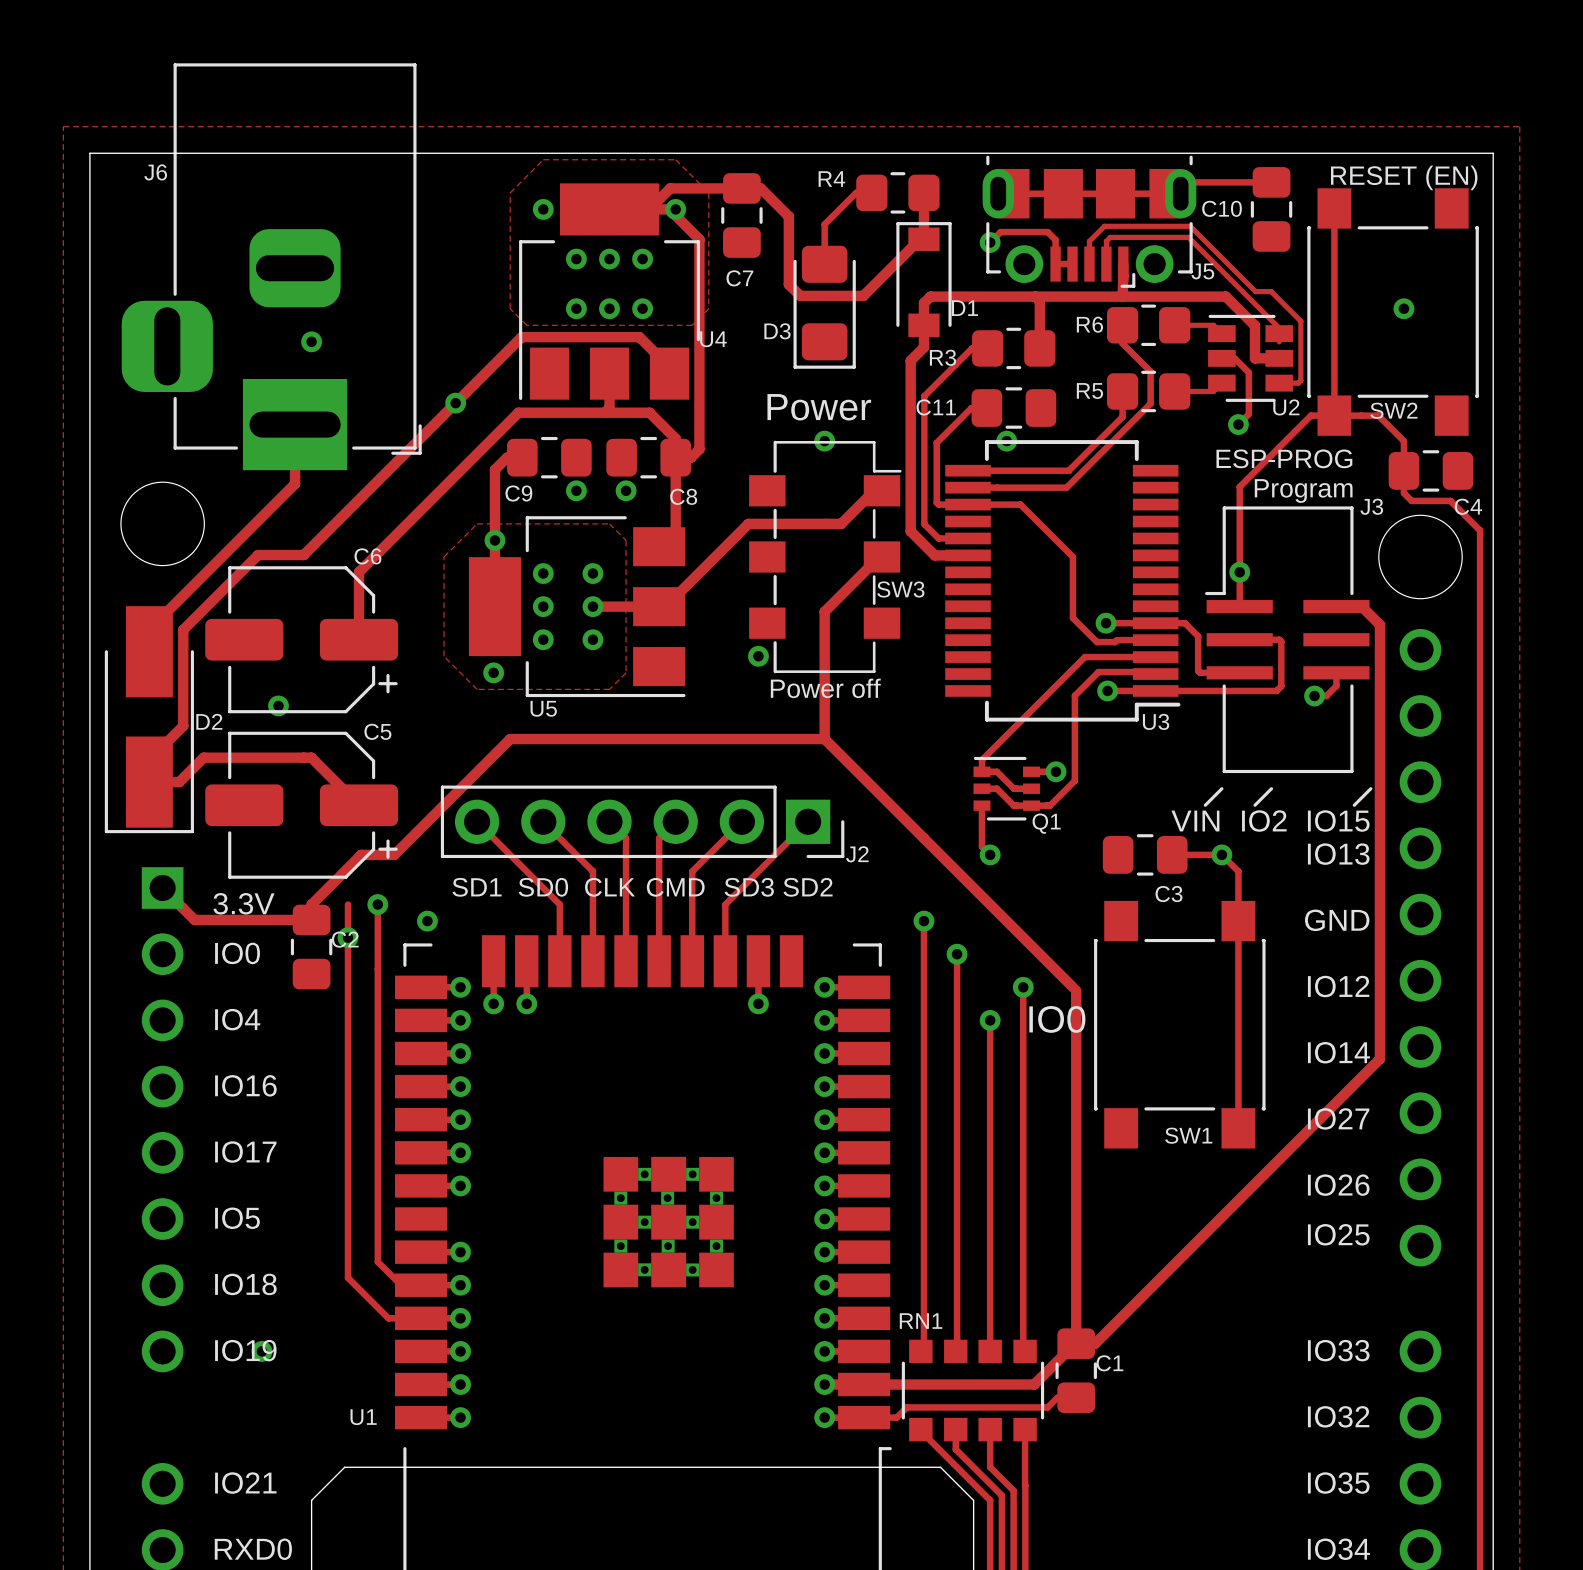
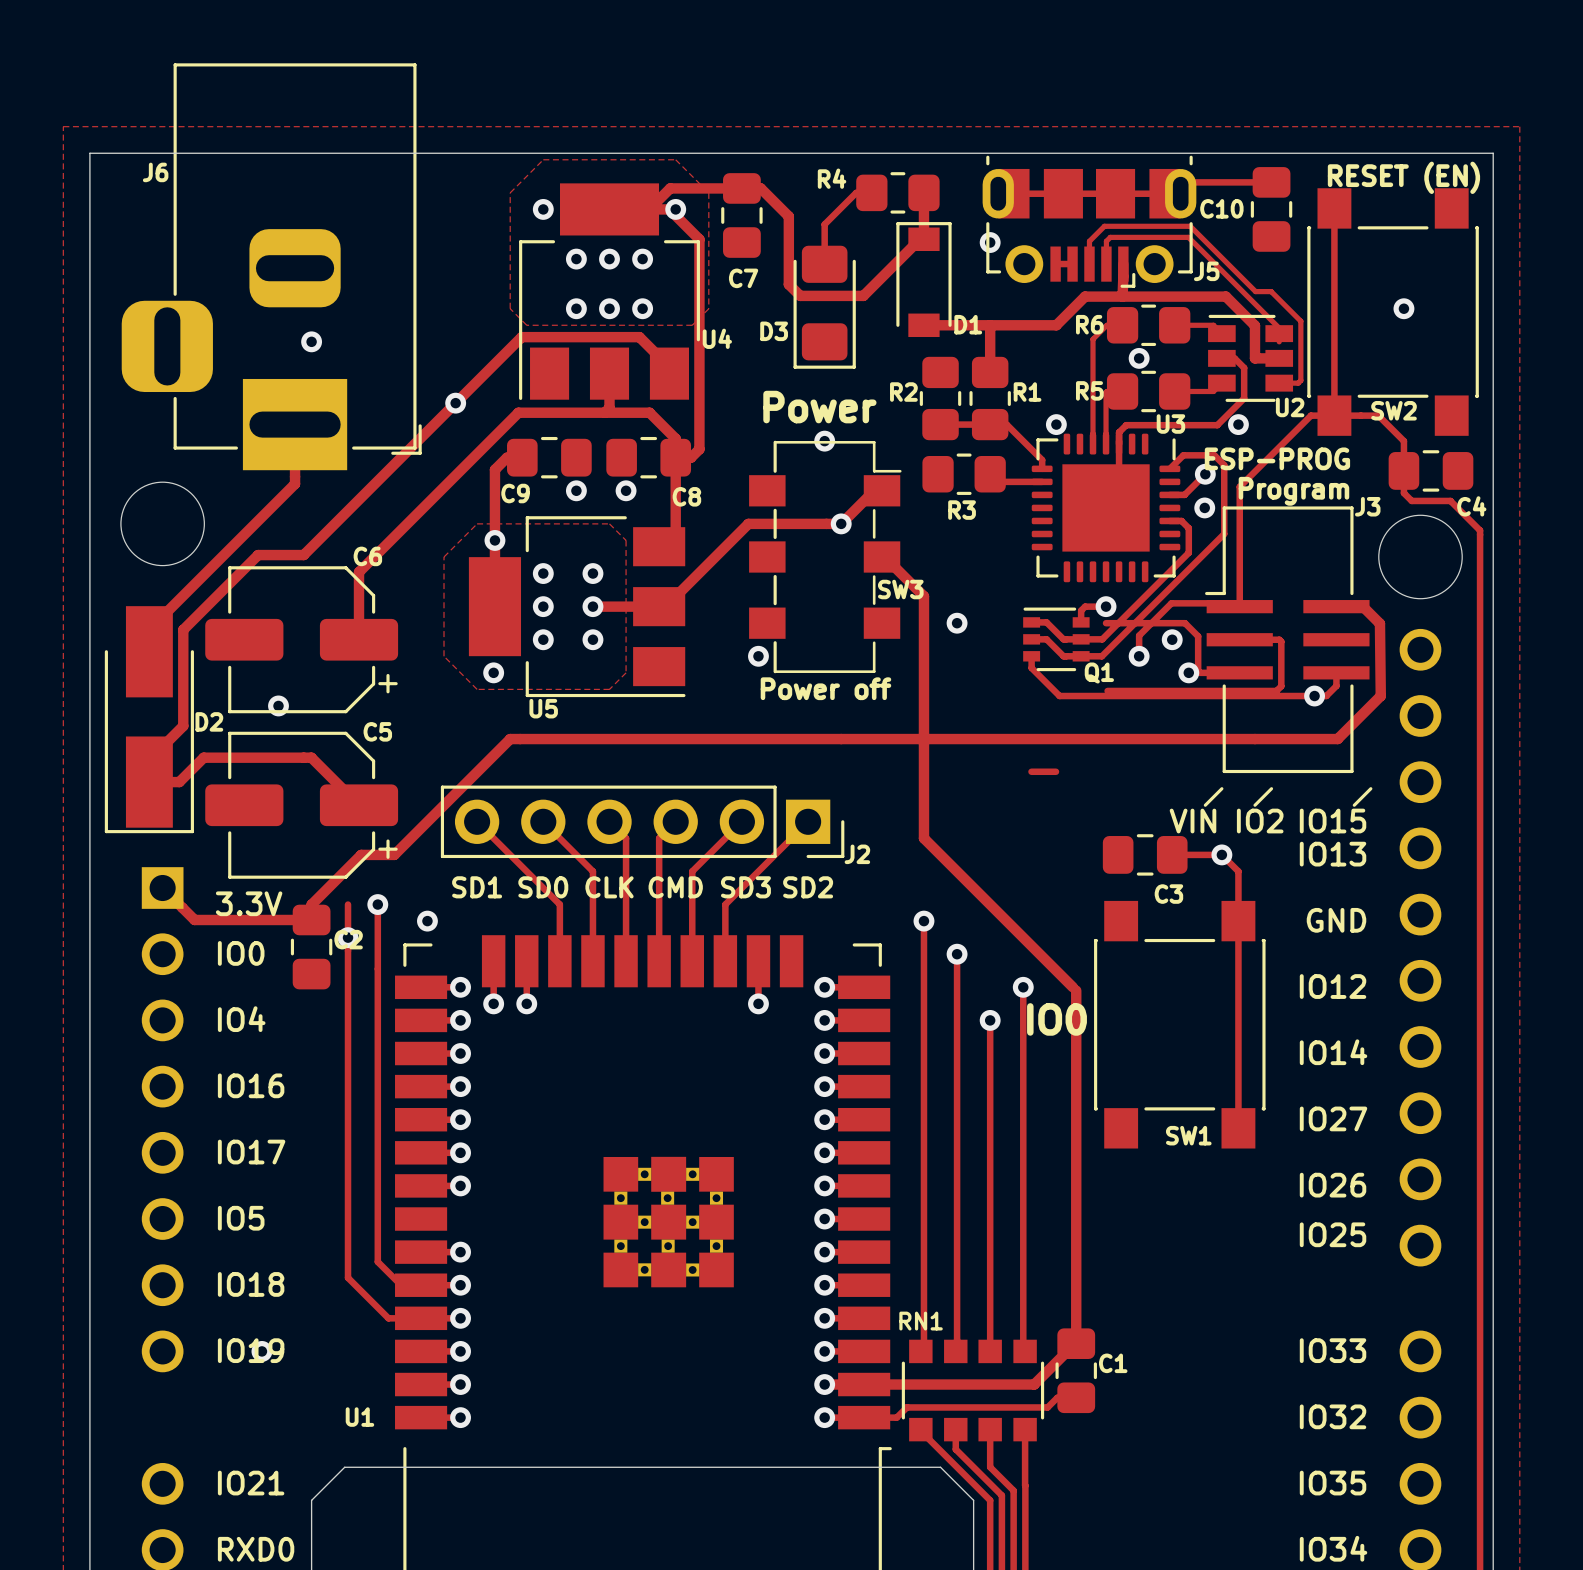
track: (990, 242) (1000, 232) (1047, 232) (1055, 239) (1055, 264) -> none
track: (1035, 296) (1039, 301) (1039, 348) -> none
track: (1085, 296) (930, 296) (923, 303) (923, 347) (910, 360) (910, 531) (934, 555) (968, 555) -> (1085, 296) (1056, 325) (923, 325)
D1 name position: D1 (964, 308) -> D1 (968, 324)
track: none -> (990, 325) (990, 372)
track: (1122, 325) (1122, 343) (1150, 371) (1150, 403) (1066, 487) (968, 487) -> (1122, 325) (1106, 325) (1093, 339) (1093, 444)
track: (987, 348) (972, 348) (924, 396) (924, 524) (938, 538) (968, 538) -> none
R3 position: (1013, 348) -> (964, 474)
R3 name position: R3 (942, 357) -> R3 (962, 510)
via: none -> (1139, 358)
track: (1244, 367) (1248, 372) (1248, 414) (1238, 424) -> (1244, 367) (1244, 398) (1217, 425) (1126, 425) (1119, 432) (1119, 491) (1106, 504)
track: (1122, 391) (1122, 416) (1068, 470) (968, 470) -> (1122, 391) (1106, 392) (1106, 444)
R2: none -> (940, 398)
R1: none -> (990, 398)
track: (986, 408) (971, 408) (936, 442) (936, 502) (938, 504) (1020, 504) (1072, 556) (1072, 618) (1096, 642) (1155, 640) -> none
C11: (1013, 408) -> none
track: none -> (940, 424) (1006, 424) (1042, 460) (1042, 468)
U3 footprint: [945, 440, 1181, 722] -> [1031, 433, 1181, 583]
via position: (1006, 441) -> (1056, 424)
track: none -> (1169, 468) (1183, 455) (1214, 455) (1224, 465) (1224, 533) (1101, 656) (1063, 656) (1046, 639) (1031, 639)
track: none -> (990, 474) (997, 481) (1042, 481)
track: none -> (1205, 474) (1184, 494) (1169, 494)
via: none -> (1205, 474)
via: none -> (1204, 507)
track: none -> (1169, 520) (1181, 520) (1188, 528) (1188, 552) (1102, 639) (1063, 639) (1046, 622) (1031, 622)
via: none -> (841, 523)
track: (882, 556) (879, 556) (824, 611) (824, 739) (923, 838) -> (882, 556) (884, 556) (923, 596) (923, 838)
via: (1239, 572) -> none
track: none -> (1106, 606) (1085, 606) (1081, 610) (1081, 622)
track: none -> (1239, 606) (1236, 603) (1171, 603) (1139, 635) (1139, 656)
track: (1361, 606) (1379, 624) (1379, 1058) (1095, 1343) (1076, 1343) -> (1361, 606) (1379, 623) (1380, 696) (1337, 739) (824, 739)
via: none -> (957, 623)
via position: (1106, 623) -> (1106, 606)
via: none -> (1172, 639)
track: none -> (1031, 656) (1031, 668) (1059, 696) (1314, 696)
via: none -> (1139, 656)
track: (1155, 657) (1084, 657) (981, 760) (981, 771) (996, 771) (1013, 788) (1031, 788) -> none
via: none -> (1188, 672)
track: (1155, 674) (1152, 672) (1098, 672) (1074, 695) (1074, 780) (1050, 805) (1013, 805) (996, 788) (981, 788) -> none
via: (1107, 690) -> none
U3 name position: U3 (1156, 721) -> U3 (1170, 424)
via: (1055, 771) -> none
Q1 position: (1006, 788) -> (1056, 639)
track: (981, 805) (981, 846) (990, 854) -> none
via: (990, 854) -> none

